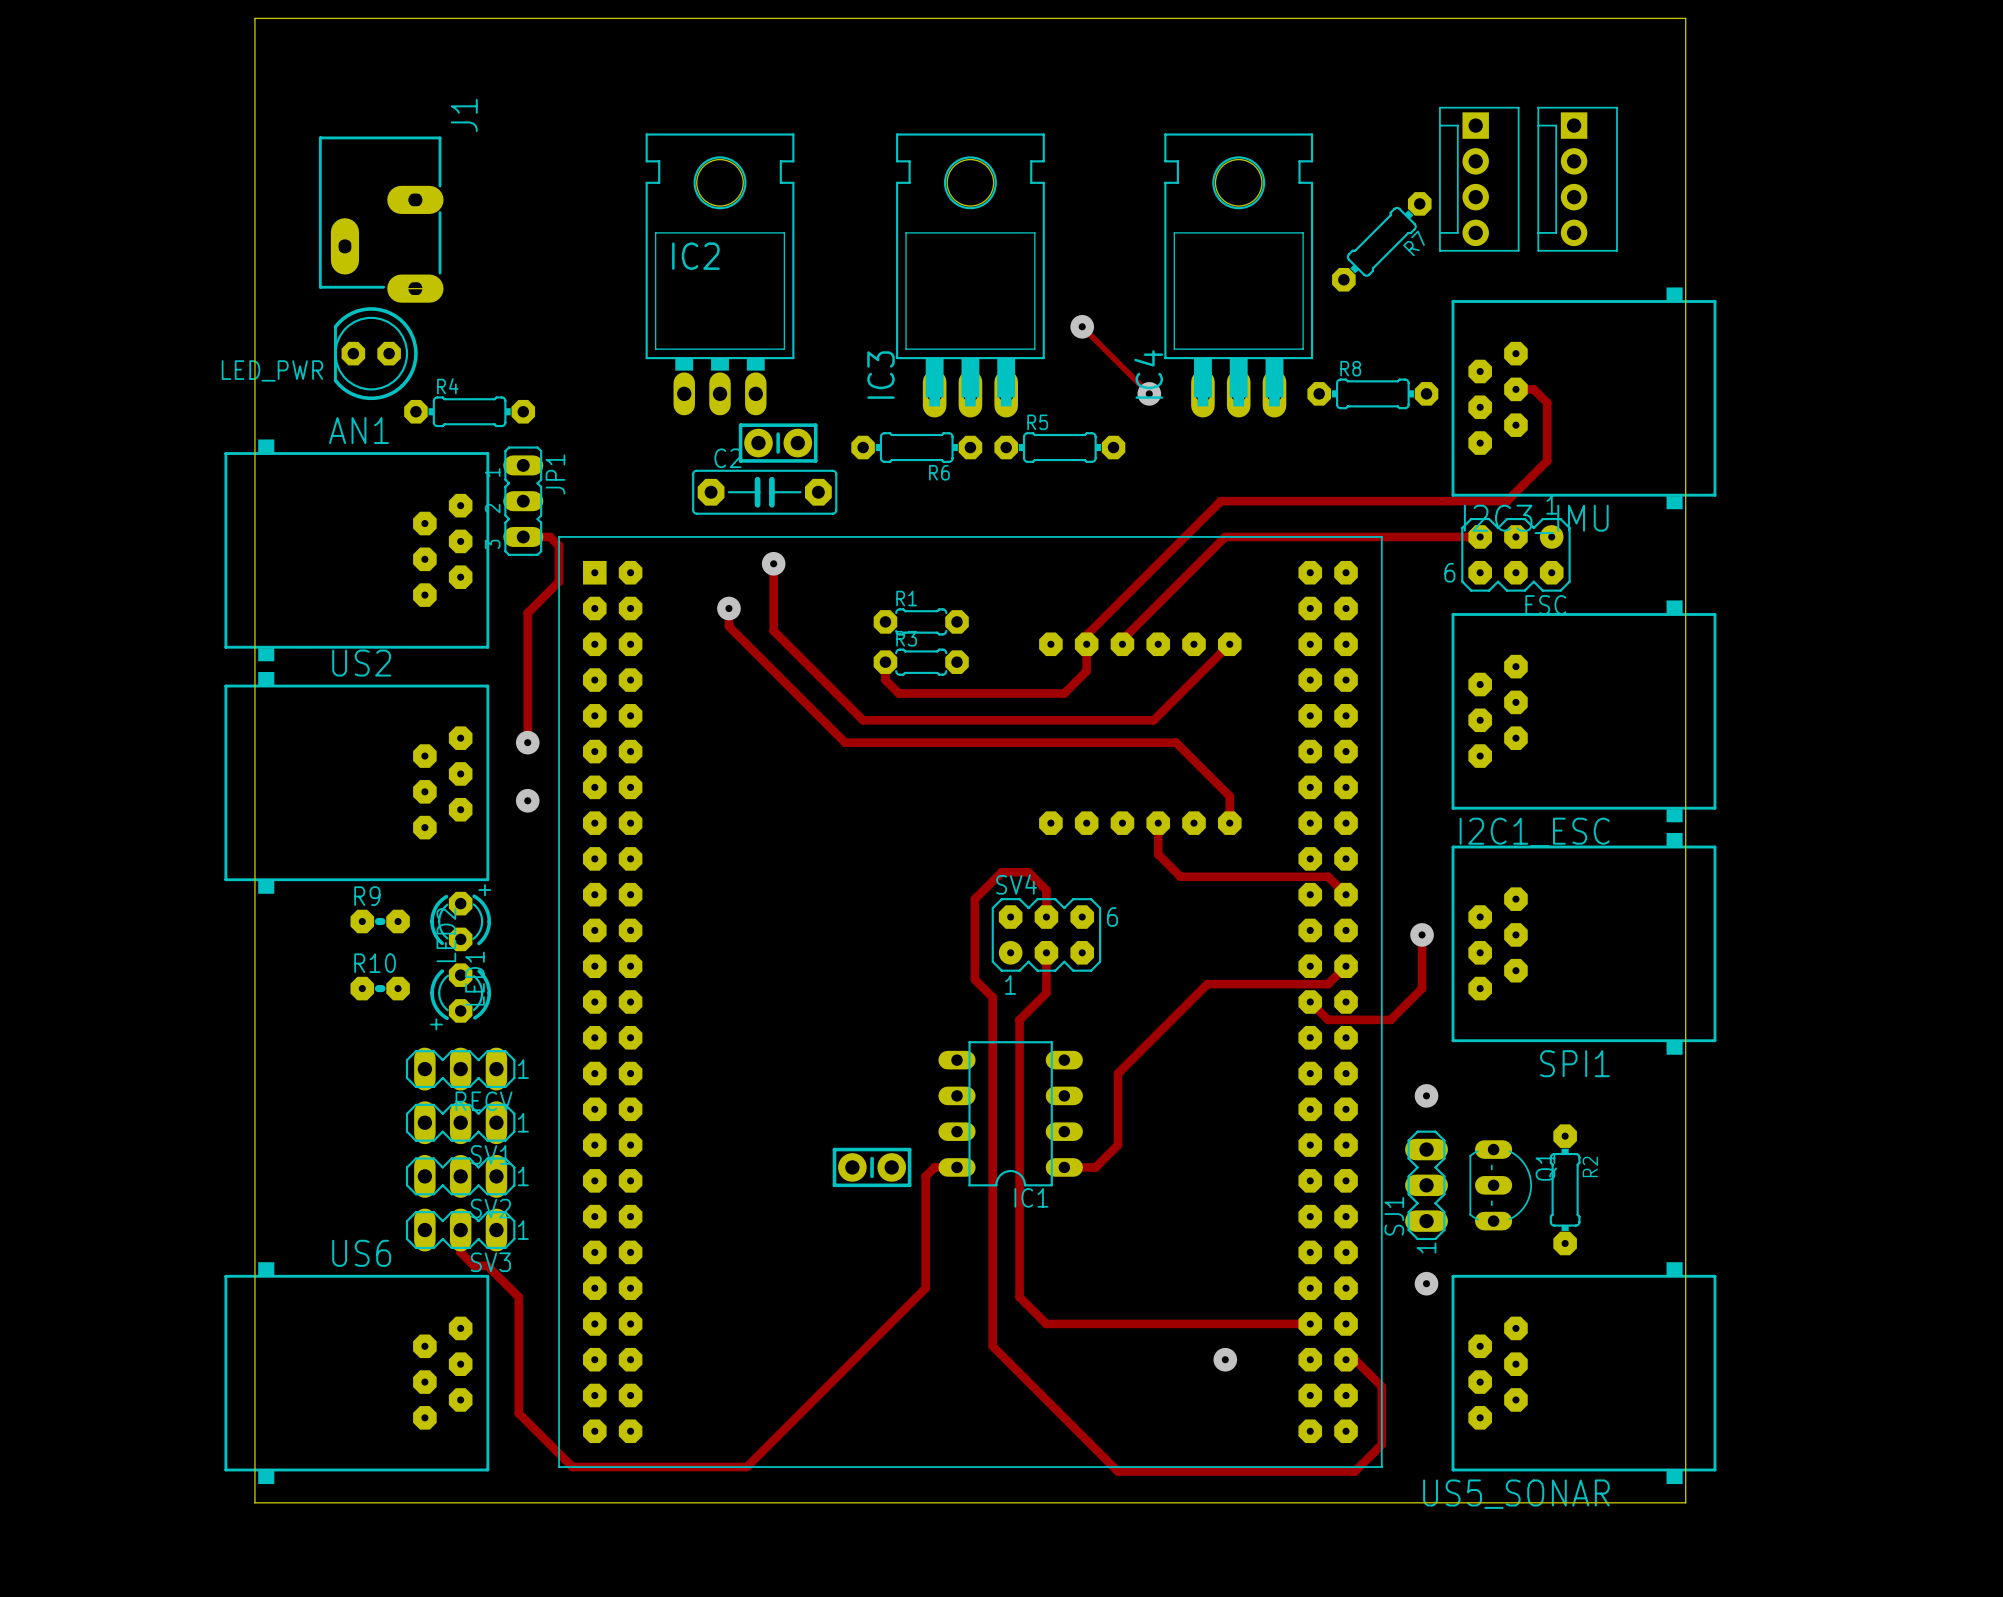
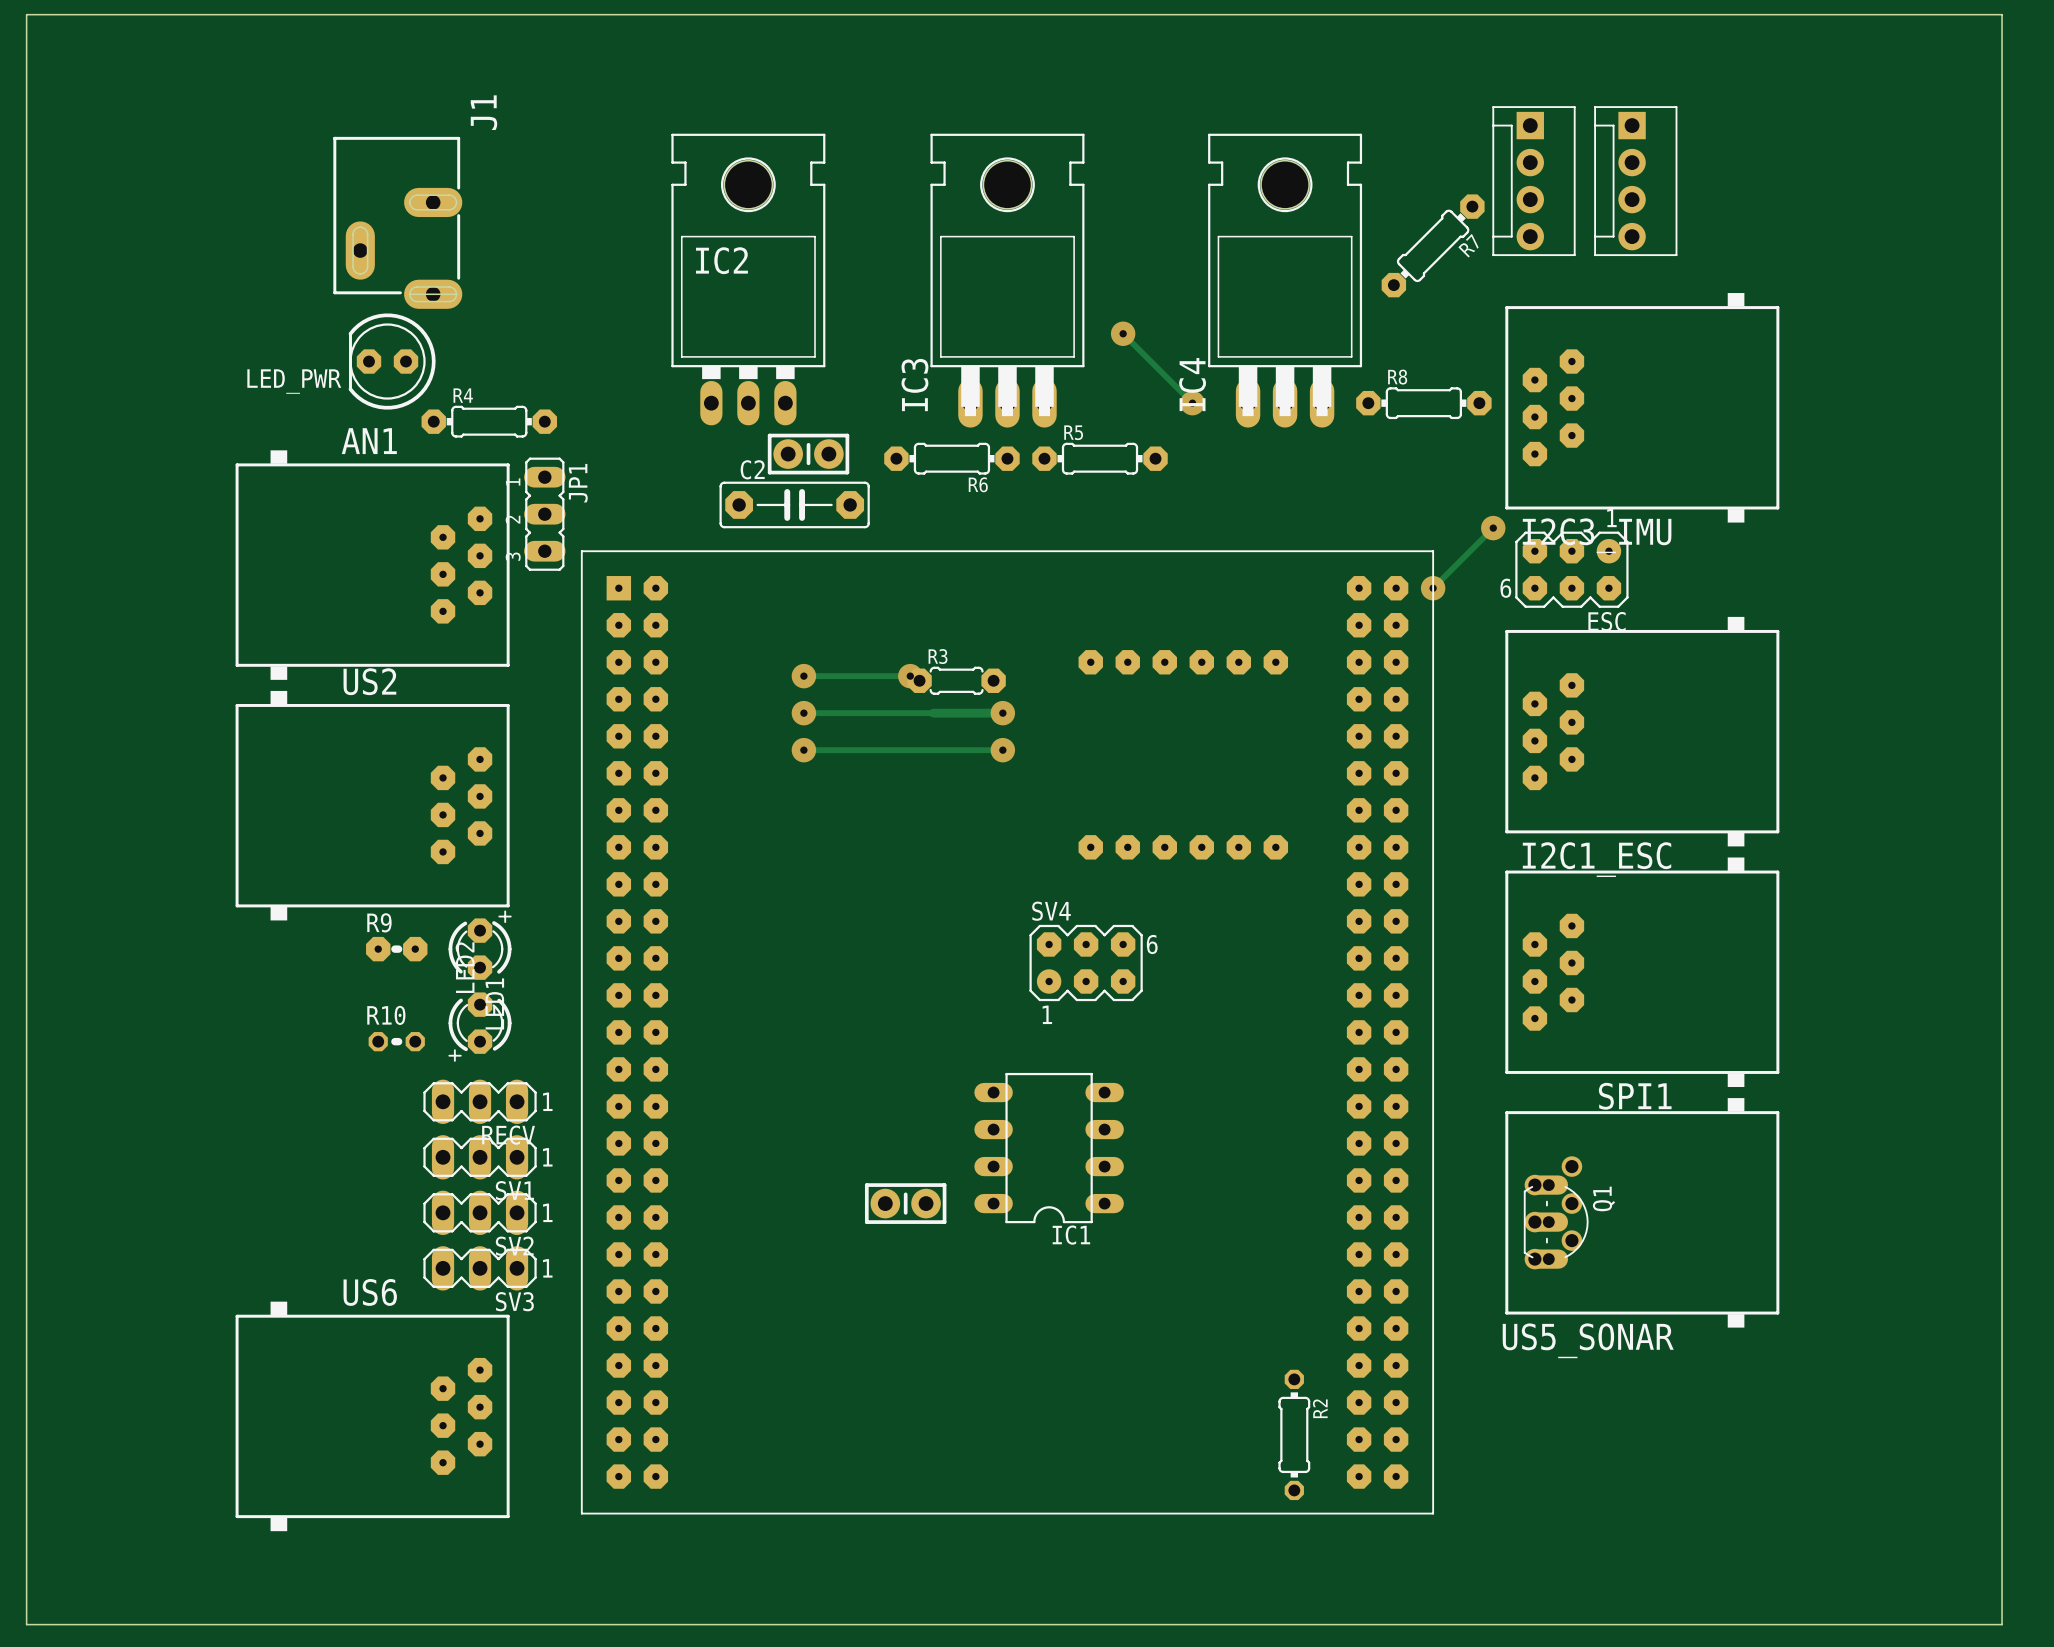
board edge: (254, 18) (254, 1502) (1685, 1502) (1685, 18) -> (267, 14) (26, 14) (26, 1624) (2002, 1624) (2002, 14) (1747, 14)
track: (1515, 389) (1533, 389) (1547, 402) (1547, 460) (1507, 501) (1220, 501) (1086, 635) (1086, 671) (1064, 693) (965, 693) -> none
track: none -> (1493, 528) (1433, 588)
via: none -> (1493, 528)
track: (523, 536) (550, 536) (559, 545) (559, 581) (527, 612) (527, 742) -> none
track: (1480, 536) (1225, 536) (1122, 639) (1122, 644) -> none
track: (773, 563) (773, 630) (863, 720) (1153, 720) (1229, 644) -> none
via: (773, 563) -> none
via: none -> (1433, 588)
track: (728, 608) (728, 626) (845, 742) (1176, 742) (1229, 796) (1229, 823) -> none
via: (728, 608) -> none
R1: (921, 621) -> none
track: none -> (803, 676) (910, 676)
via: none -> (803, 676)
via: none -> (910, 676)
track: (885, 662) (885, 680) (898, 693) -> (803, 713) (933, 713)
via: none -> (803, 713)
via: none -> (1002, 713)
track: none -> (803, 750) (1002, 750)
via: none -> (803, 750)
via: none -> (1002, 750)
via: (527, 742) -> none
via: (527, 800) -> none
track: (1158, 823) (1158, 854) (1180, 876) (1328, 876) (1346, 894) -> none
track: (1046, 917) (1046, 890) (1028, 872) (1001, 872) (974, 899) (974, 979) (992, 997) (992, 1346) (1117, 1471) (1354, 1471) (1381, 1444) (1381, 1386) (1354, 1359) (1346, 1359) -> none
track: (1422, 934) (1422, 988) (1390, 1019) (1328, 1019) (1310, 1002) -> none
via: (1422, 934) -> none
track: (1046, 952) (1046, 993) (1019, 1019) (1019, 1297) (1046, 1323) (1310, 1323) -> none
track: (1346, 966) (1328, 984) (1207, 984) (1117, 1073) (1117, 1145) (1095, 1167) (1064, 1167) -> none
R10 footprint: [350, 976, 410, 1001] -> [368, 1032, 425, 1052]
via: (1426, 1095) -> none
R2 footprint: [1549, 1124, 1581, 1256] -> [1278, 1369, 1311, 1501]
track: (957, 1167) (934, 1167) (925, 1176) (925, 1288) (746, 1467) (572, 1467) (518, 1413) (518, 1297) (487, 1265) (474, 1265) (460, 1252) (460, 1230) -> none
SJ1: (1426, 1185) -> none
US5_SONAR footprint: [1451, 1262, 1717, 1485] -> [1505, 1098, 1780, 1328]
via: (1426, 1283) -> none
via: (1225, 1359) -> none

